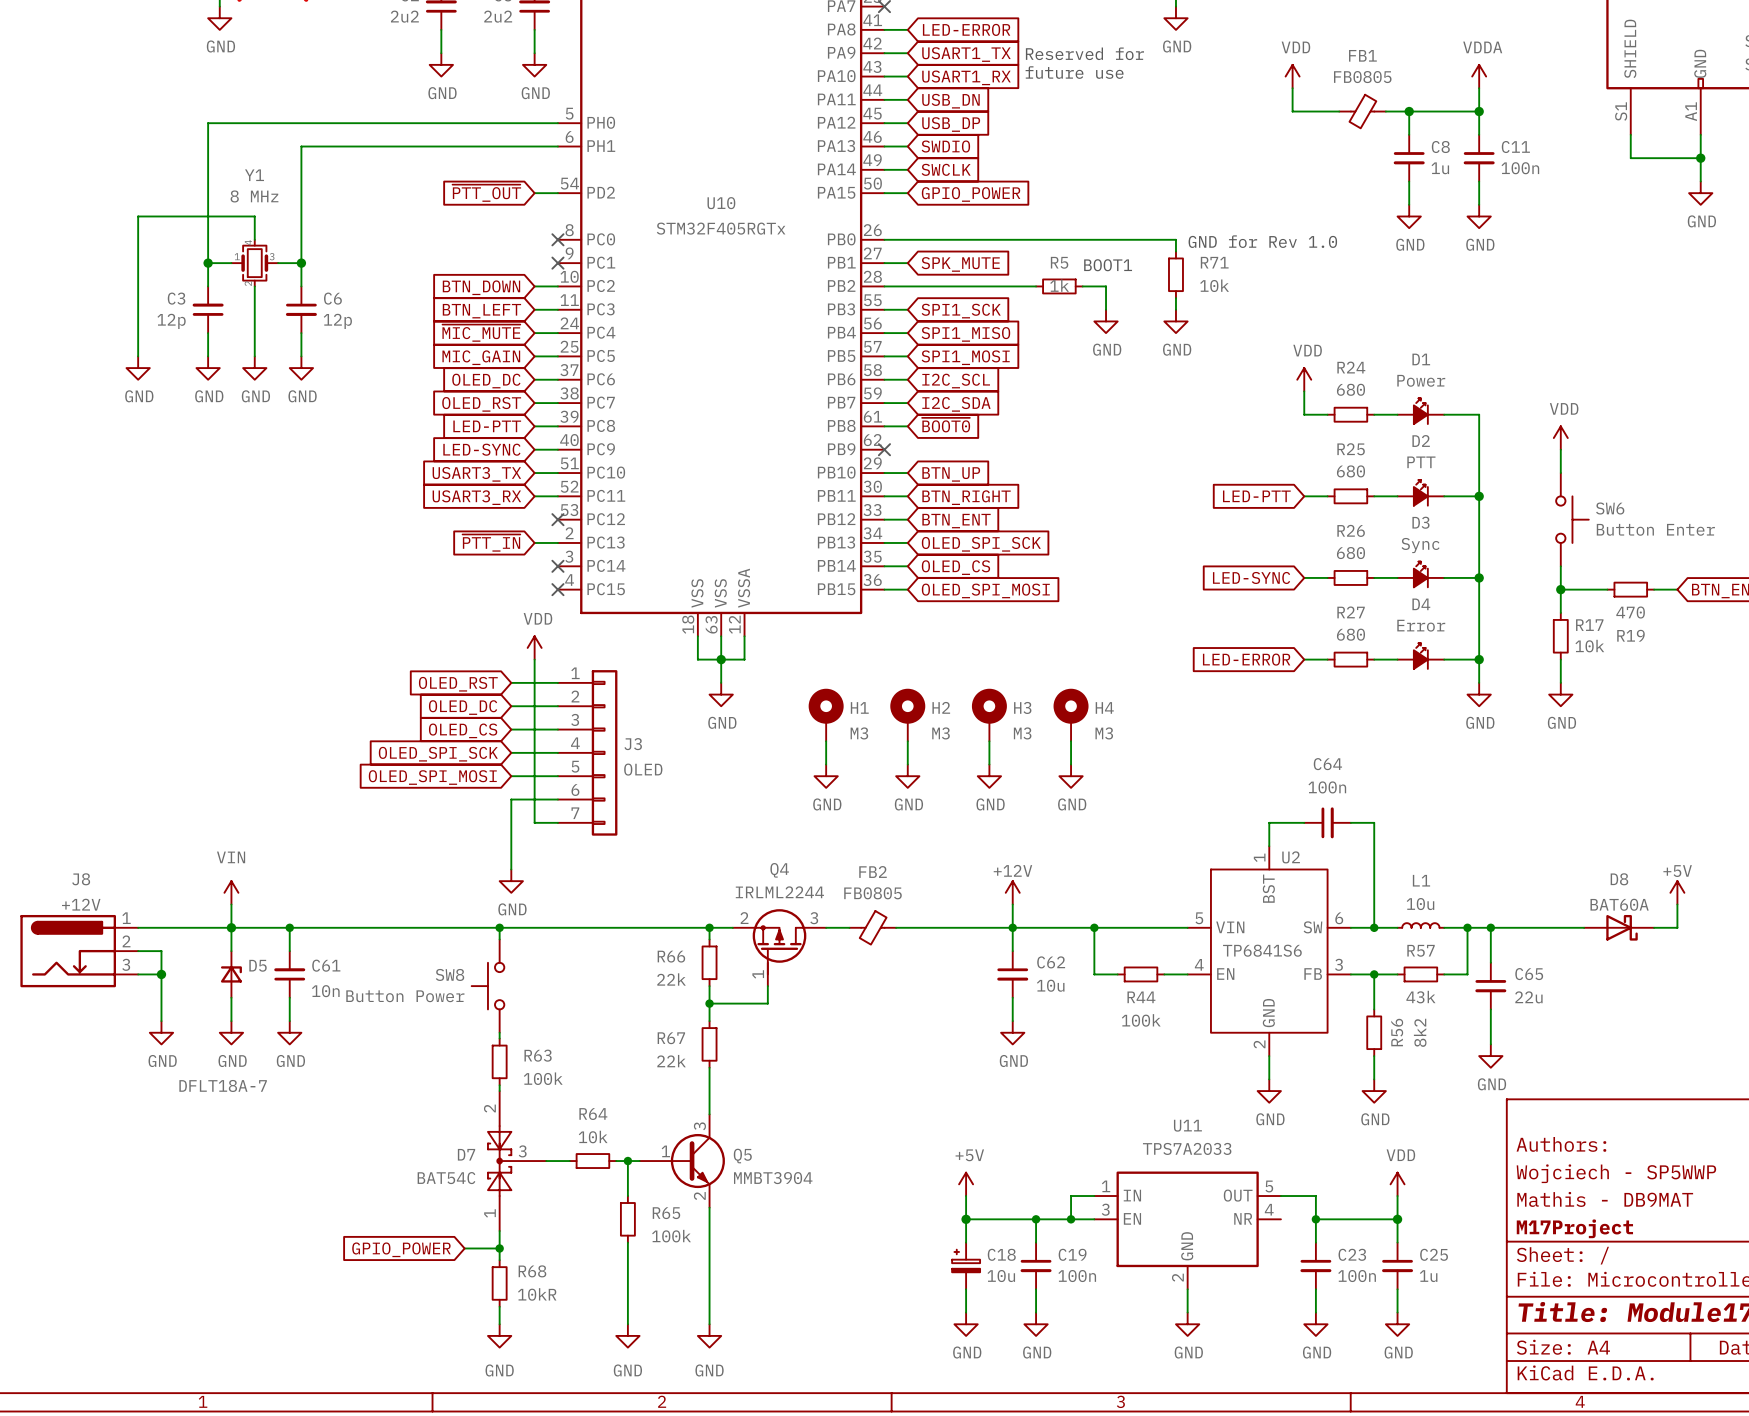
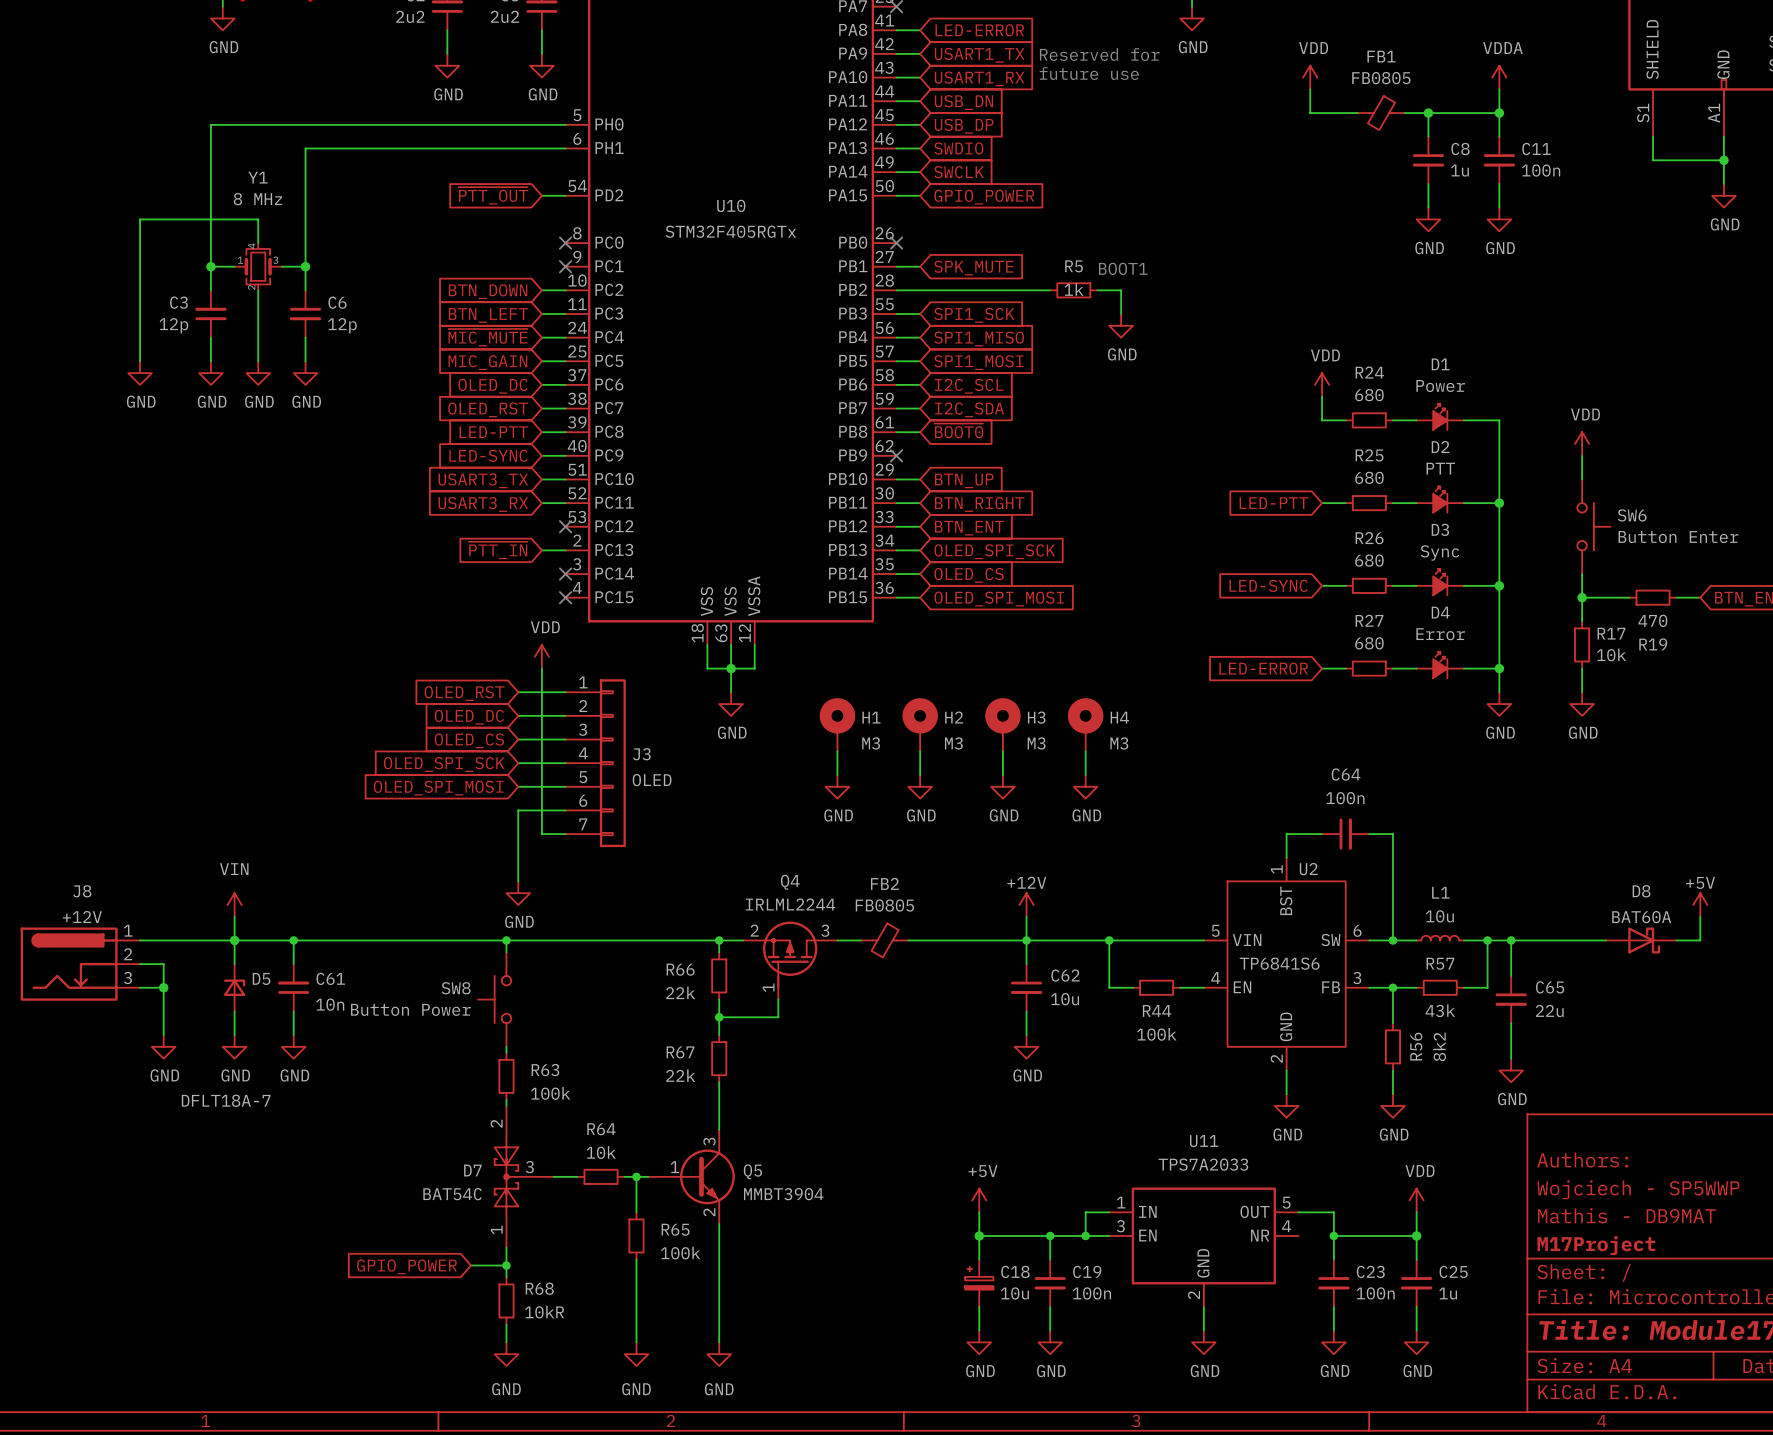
wire: (884, 239) (1175, 239) (1175, 251) -> none
no-connect mark: none -> (896, 243)
text: GND for Rev 1.0 (1262, 241) -> none
R71: 10k (1175, 274) -> none
wire: (1175, 298) (1175, 309) -> none
power symbol: GND (1175, 321) -> none

